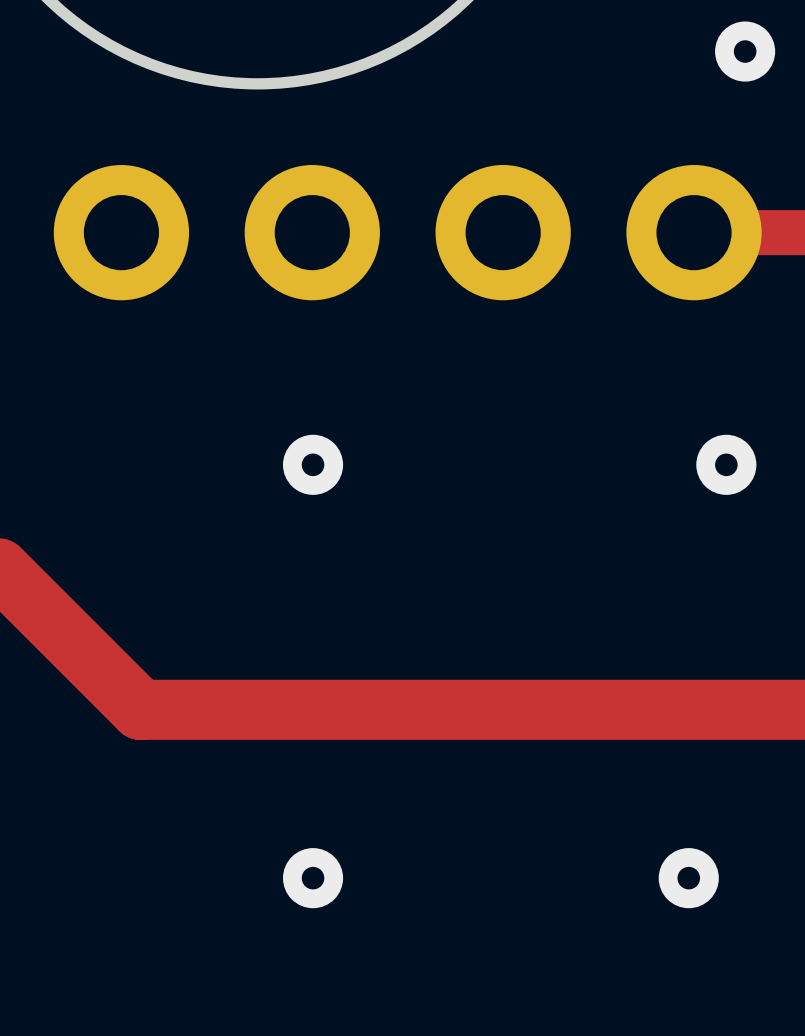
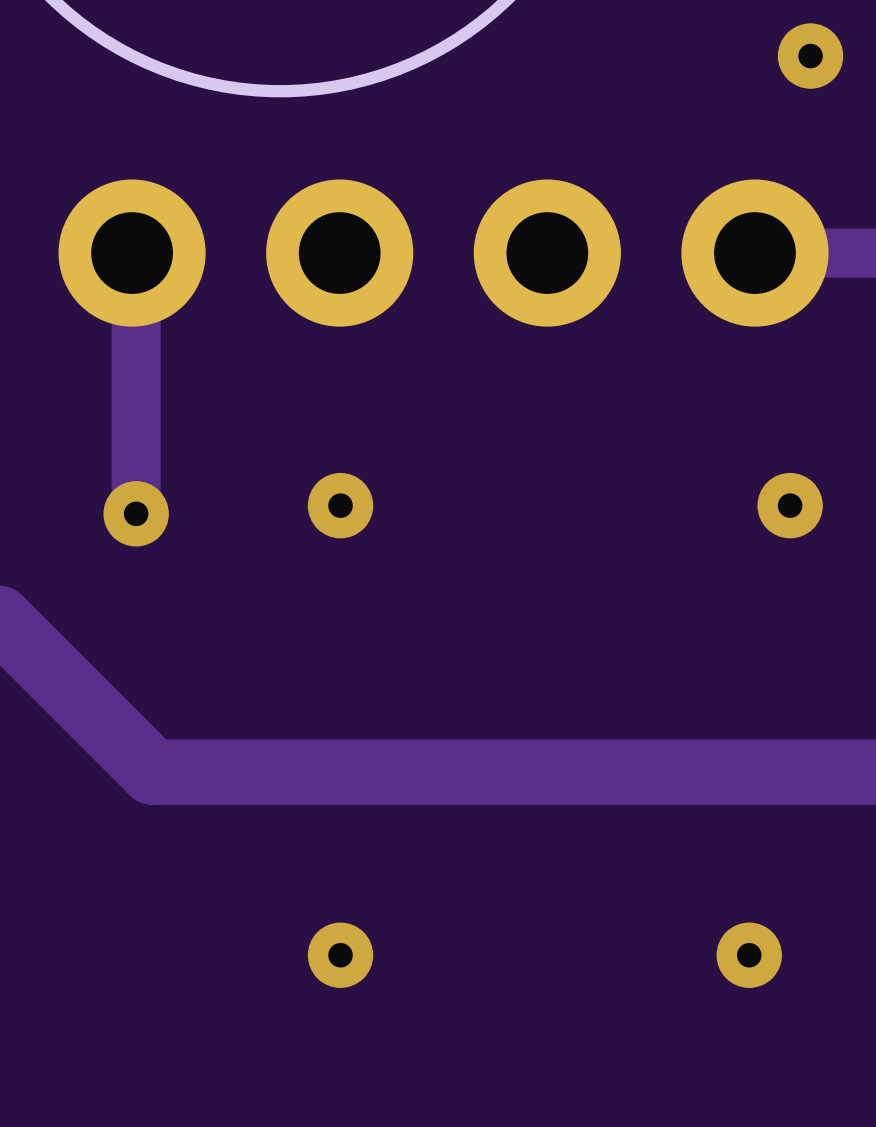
track: none -> (132, 253) (136, 257) (136, 513)
via: none -> (136, 513)

